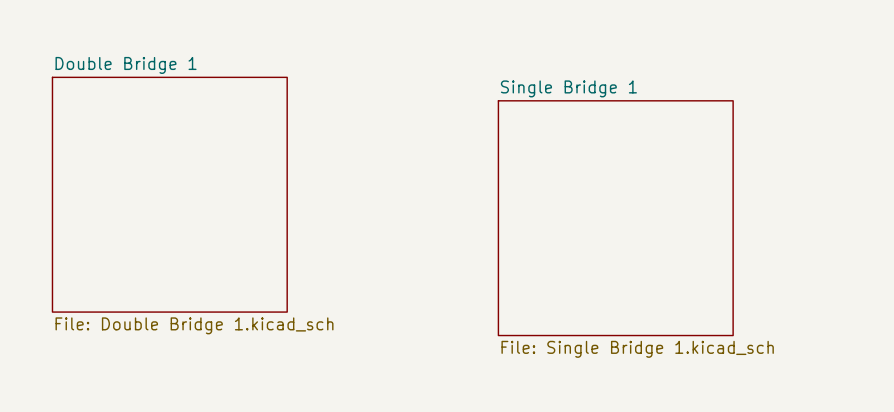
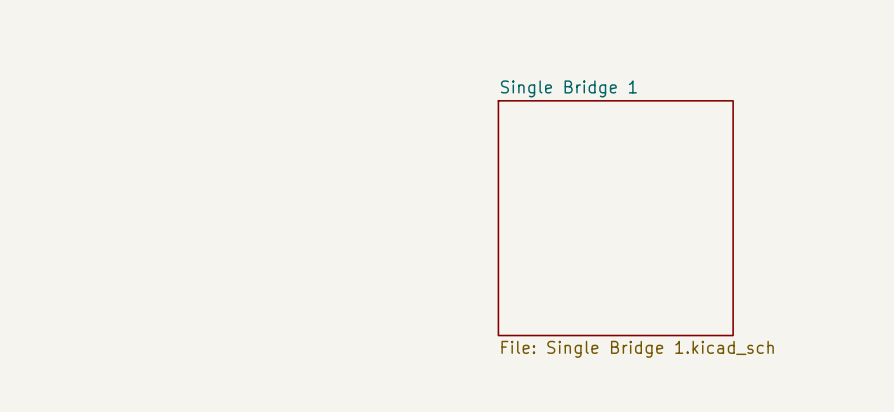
sheet Double Bridge 1: File: Double Bridge 1.kicad_sch (169, 194) -> none

